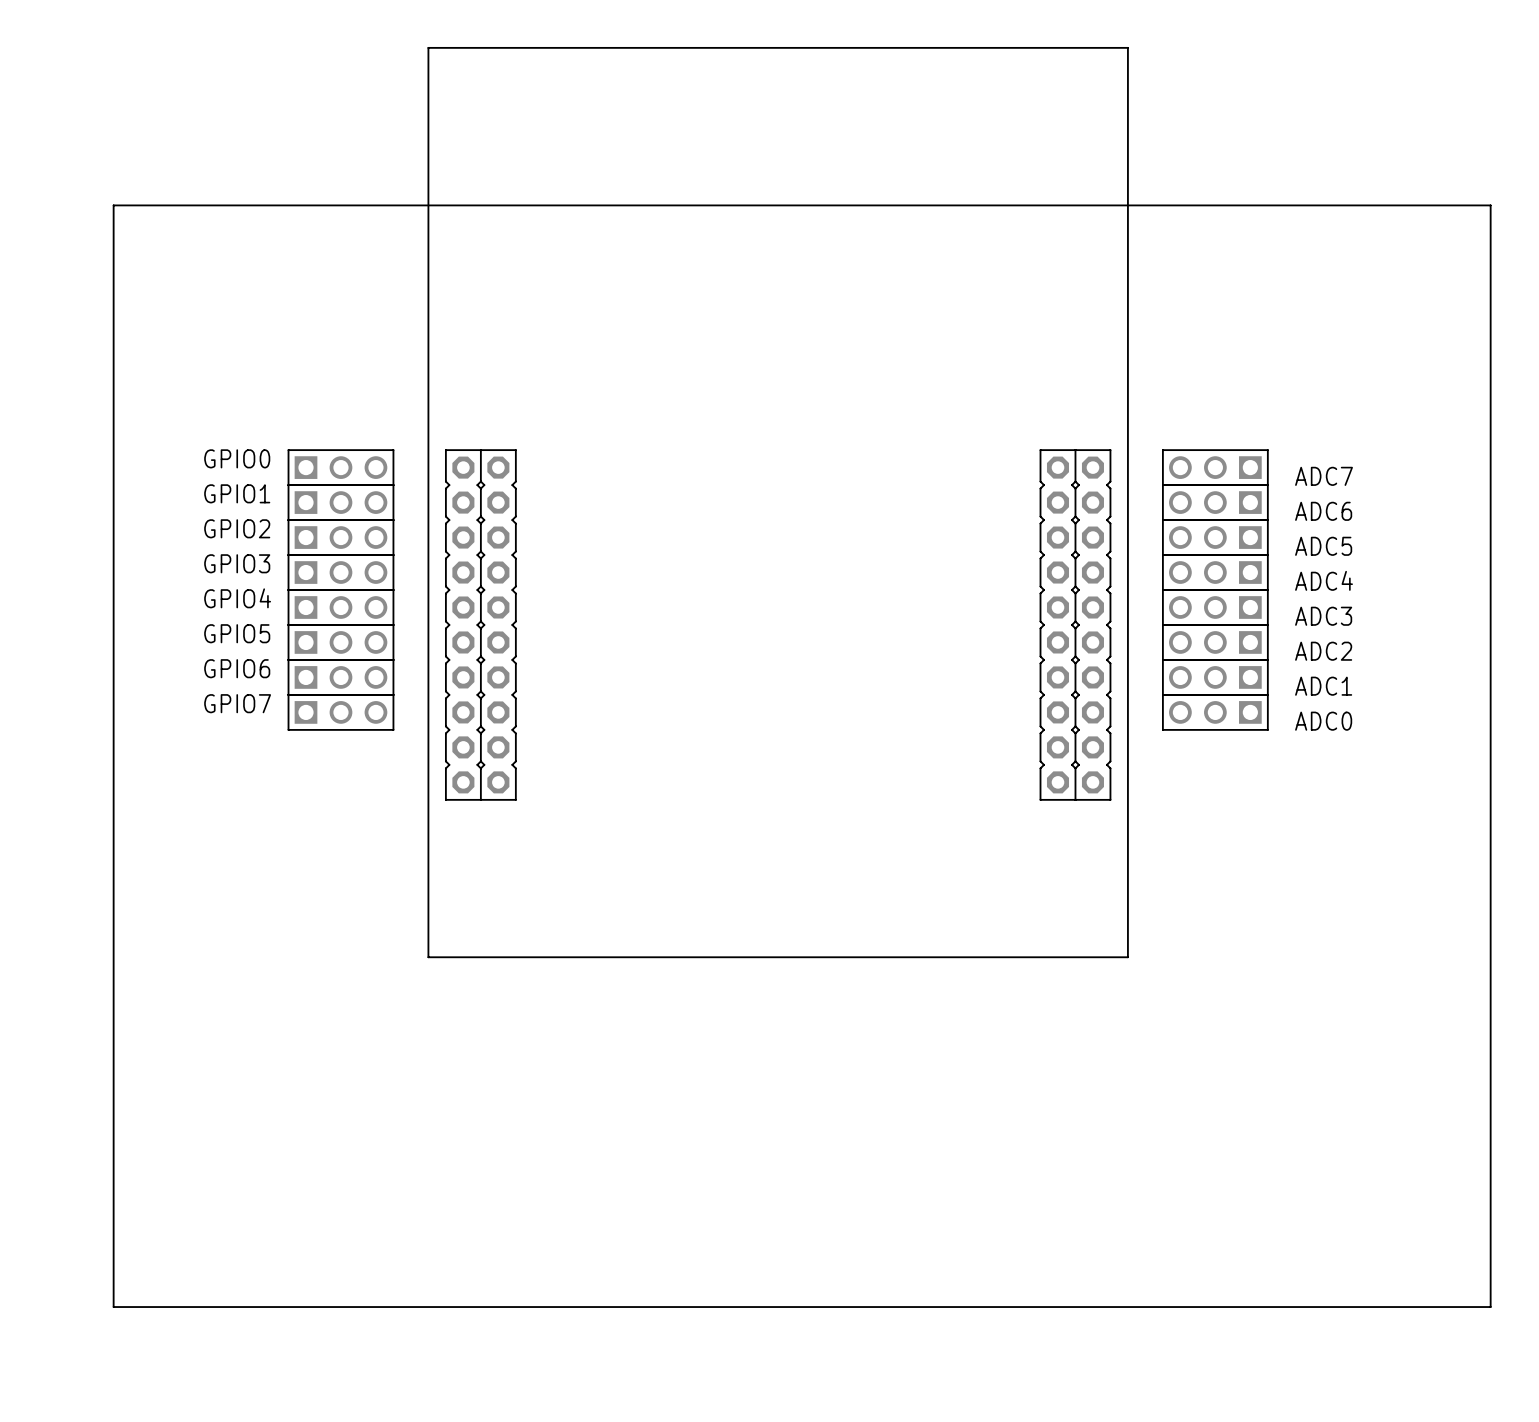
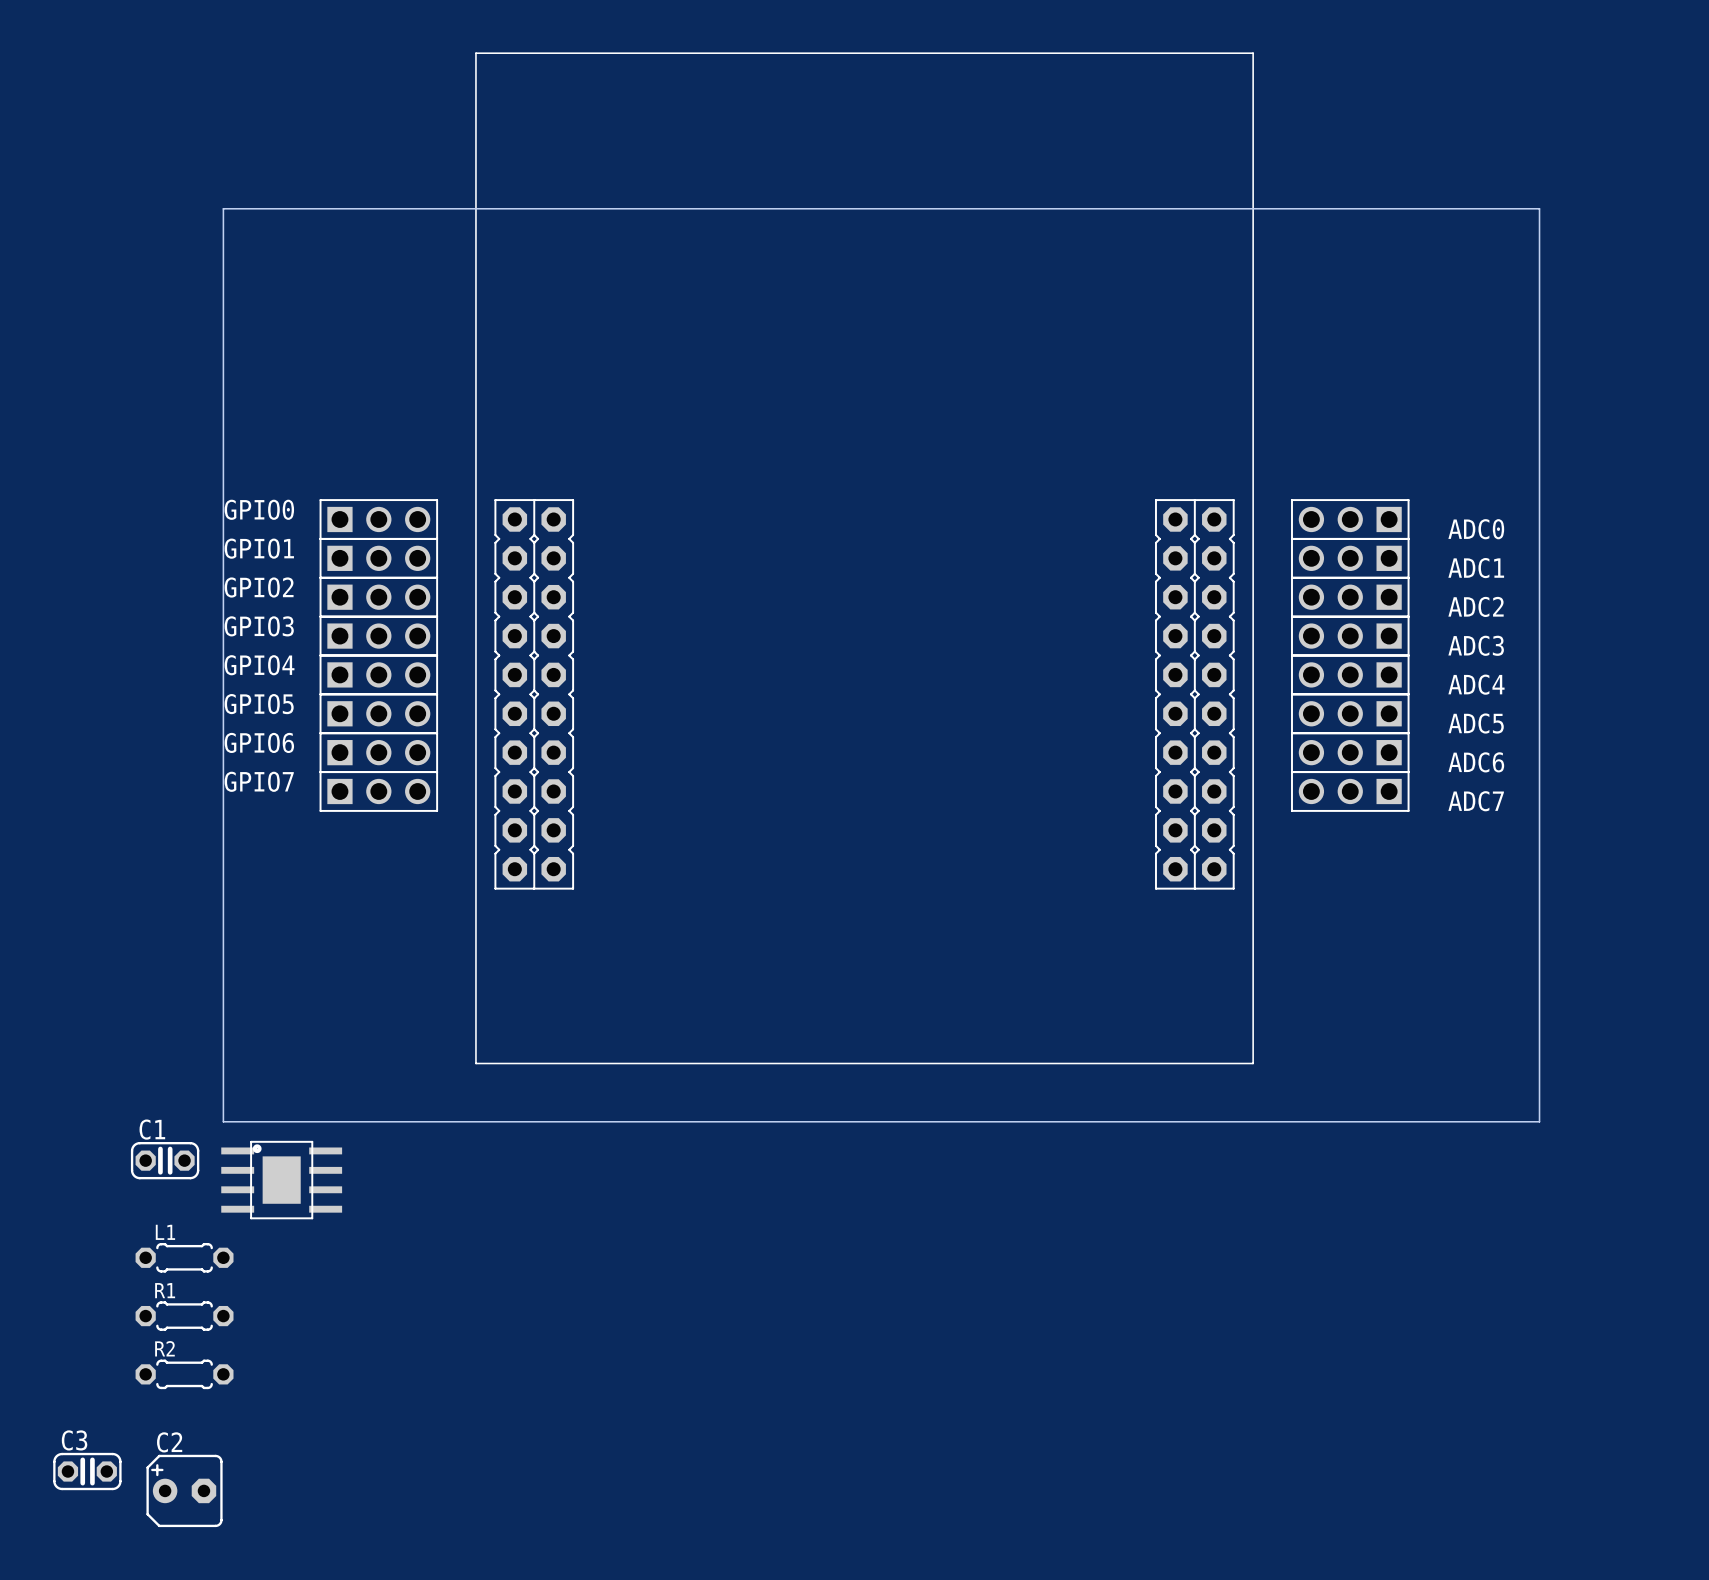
board edge: (113, 205) (1490, 205) (1490, 1307) (113, 1307) (113, 205) -> (223, 208) (223, 1121) (1539, 1121) (1539, 208) (223, 208)
ADC7 name: ADC7 (1324, 476) -> ADC0 (1476, 529)
ADC6 name: ADC6 (1323, 511) -> ADC1 (1476, 568)
ADC5 name: ADC5 (1323, 546) -> ADC2 (1476, 606)
ADC4 name: ADC4 (1324, 580) -> ADC3 (1476, 645)
ADC3 name: ADC3 (1323, 616) -> ADC4 (1476, 684)
ADC2 name: ADC2 (1323, 651) -> ADC5 (1476, 723)
ADC1 name: ADC1 (1323, 686) -> ADC6 (1476, 762)
ADC0 name: ADC0 (1323, 721) -> ADC7 (1476, 801)
C1: none -> (165, 1160)
part: none -> (281, 1180)
L1: none -> (184, 1257)
R1: none -> (184, 1316)
R2: none -> (184, 1374)
C3: none -> (87, 1471)
C2: none -> (184, 1490)

